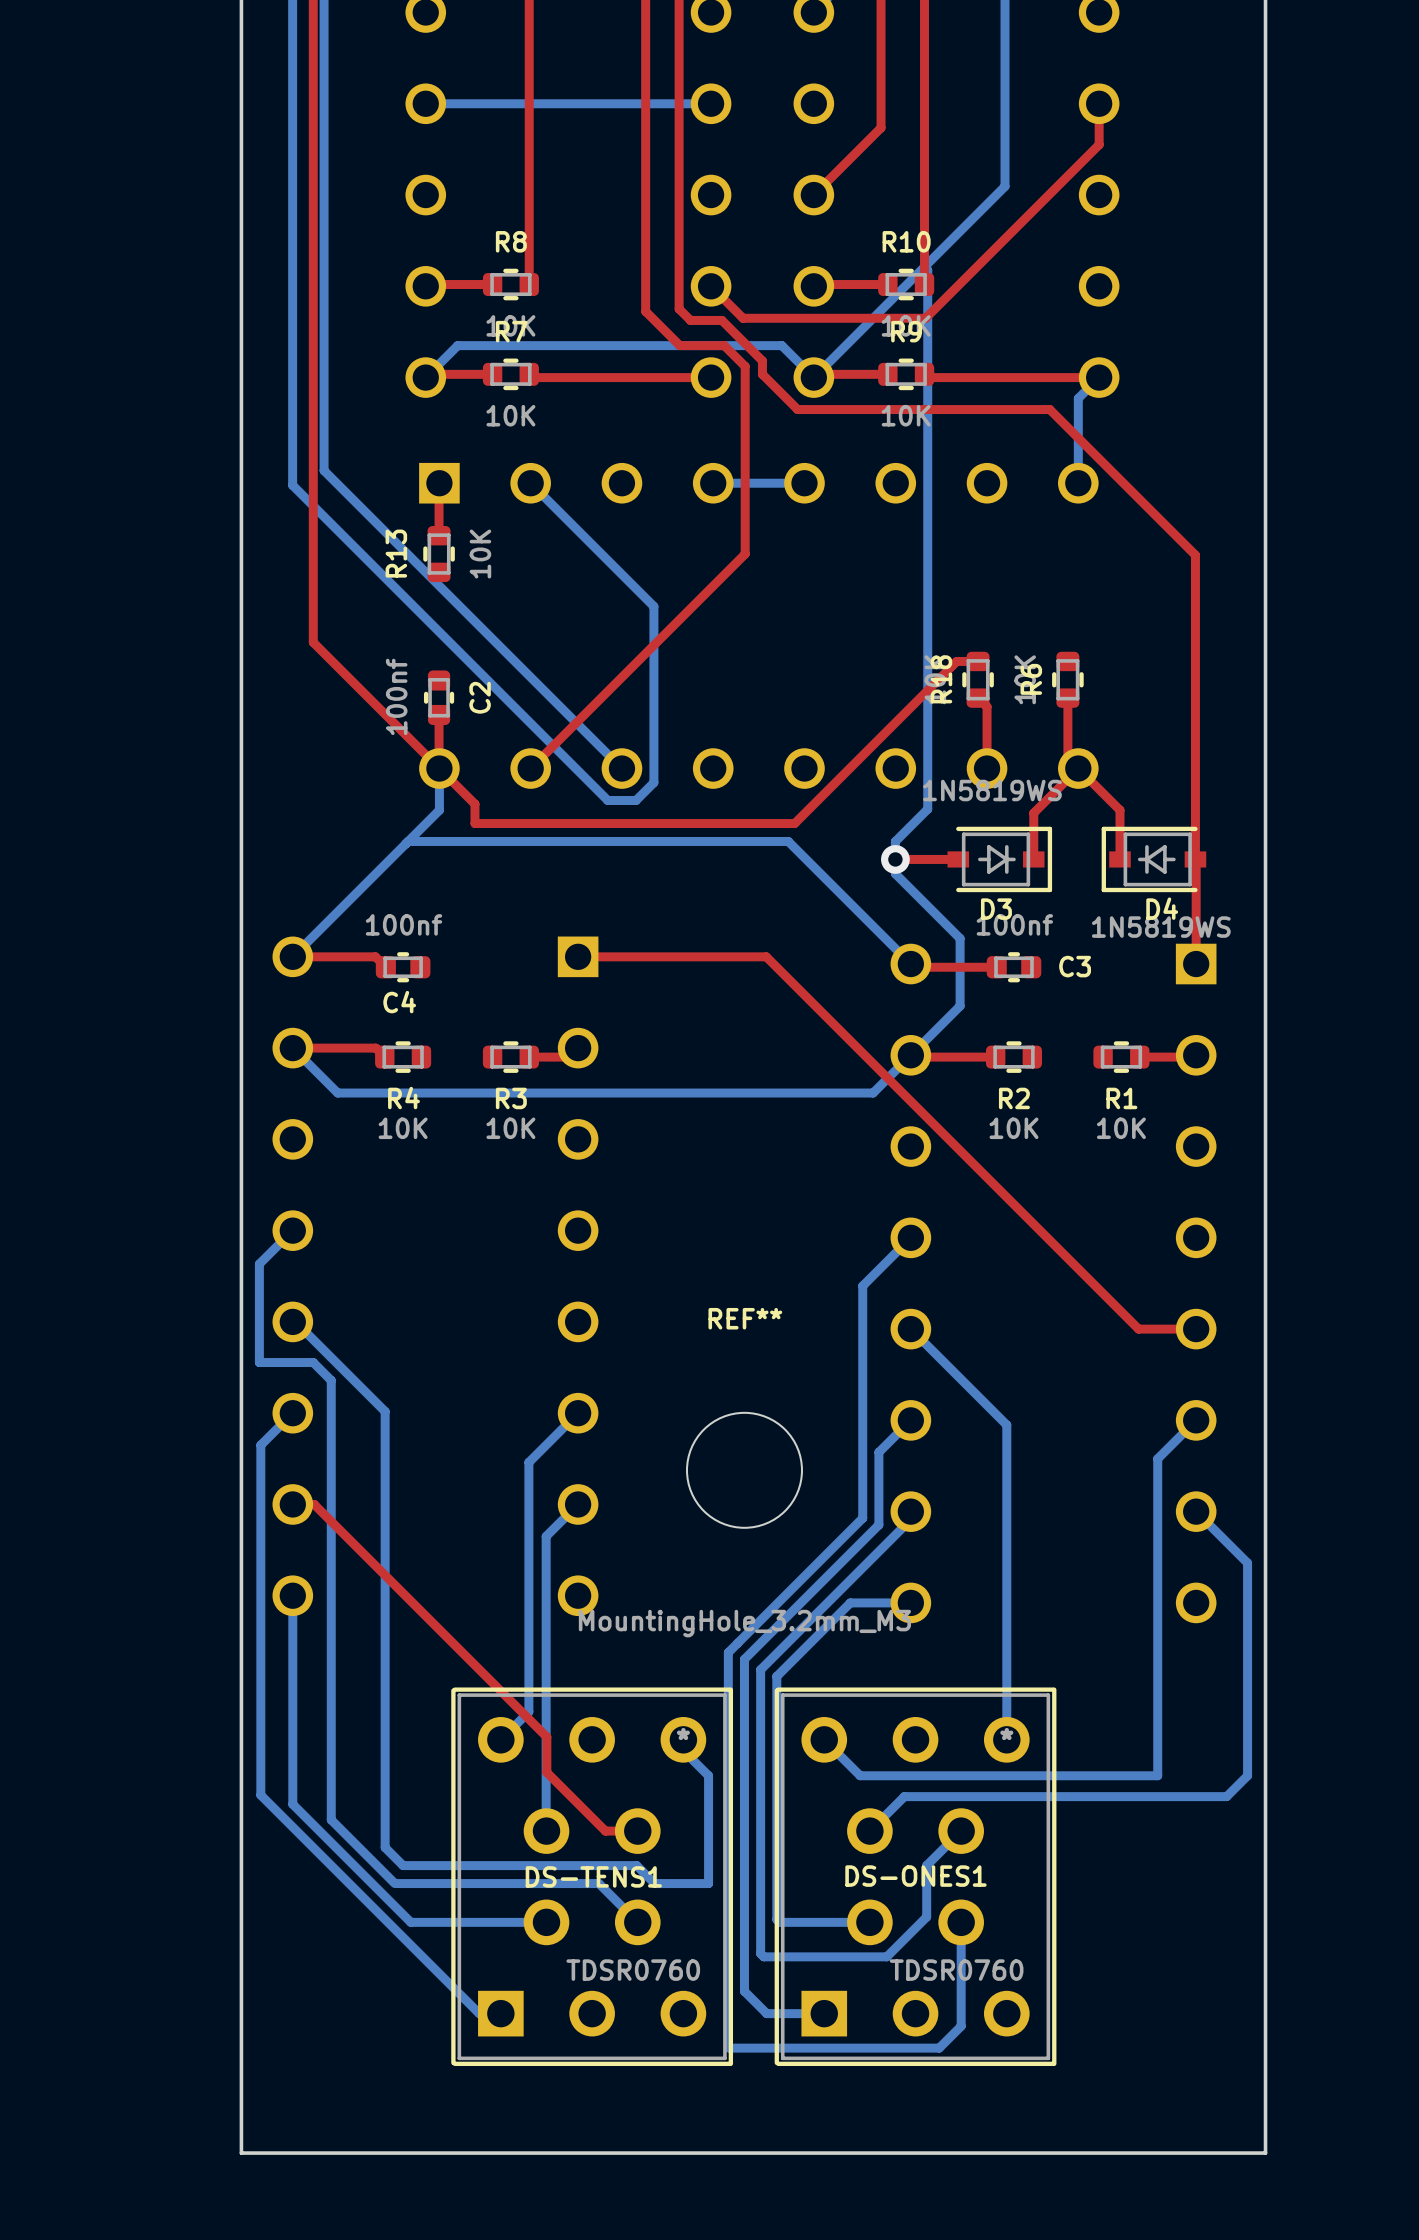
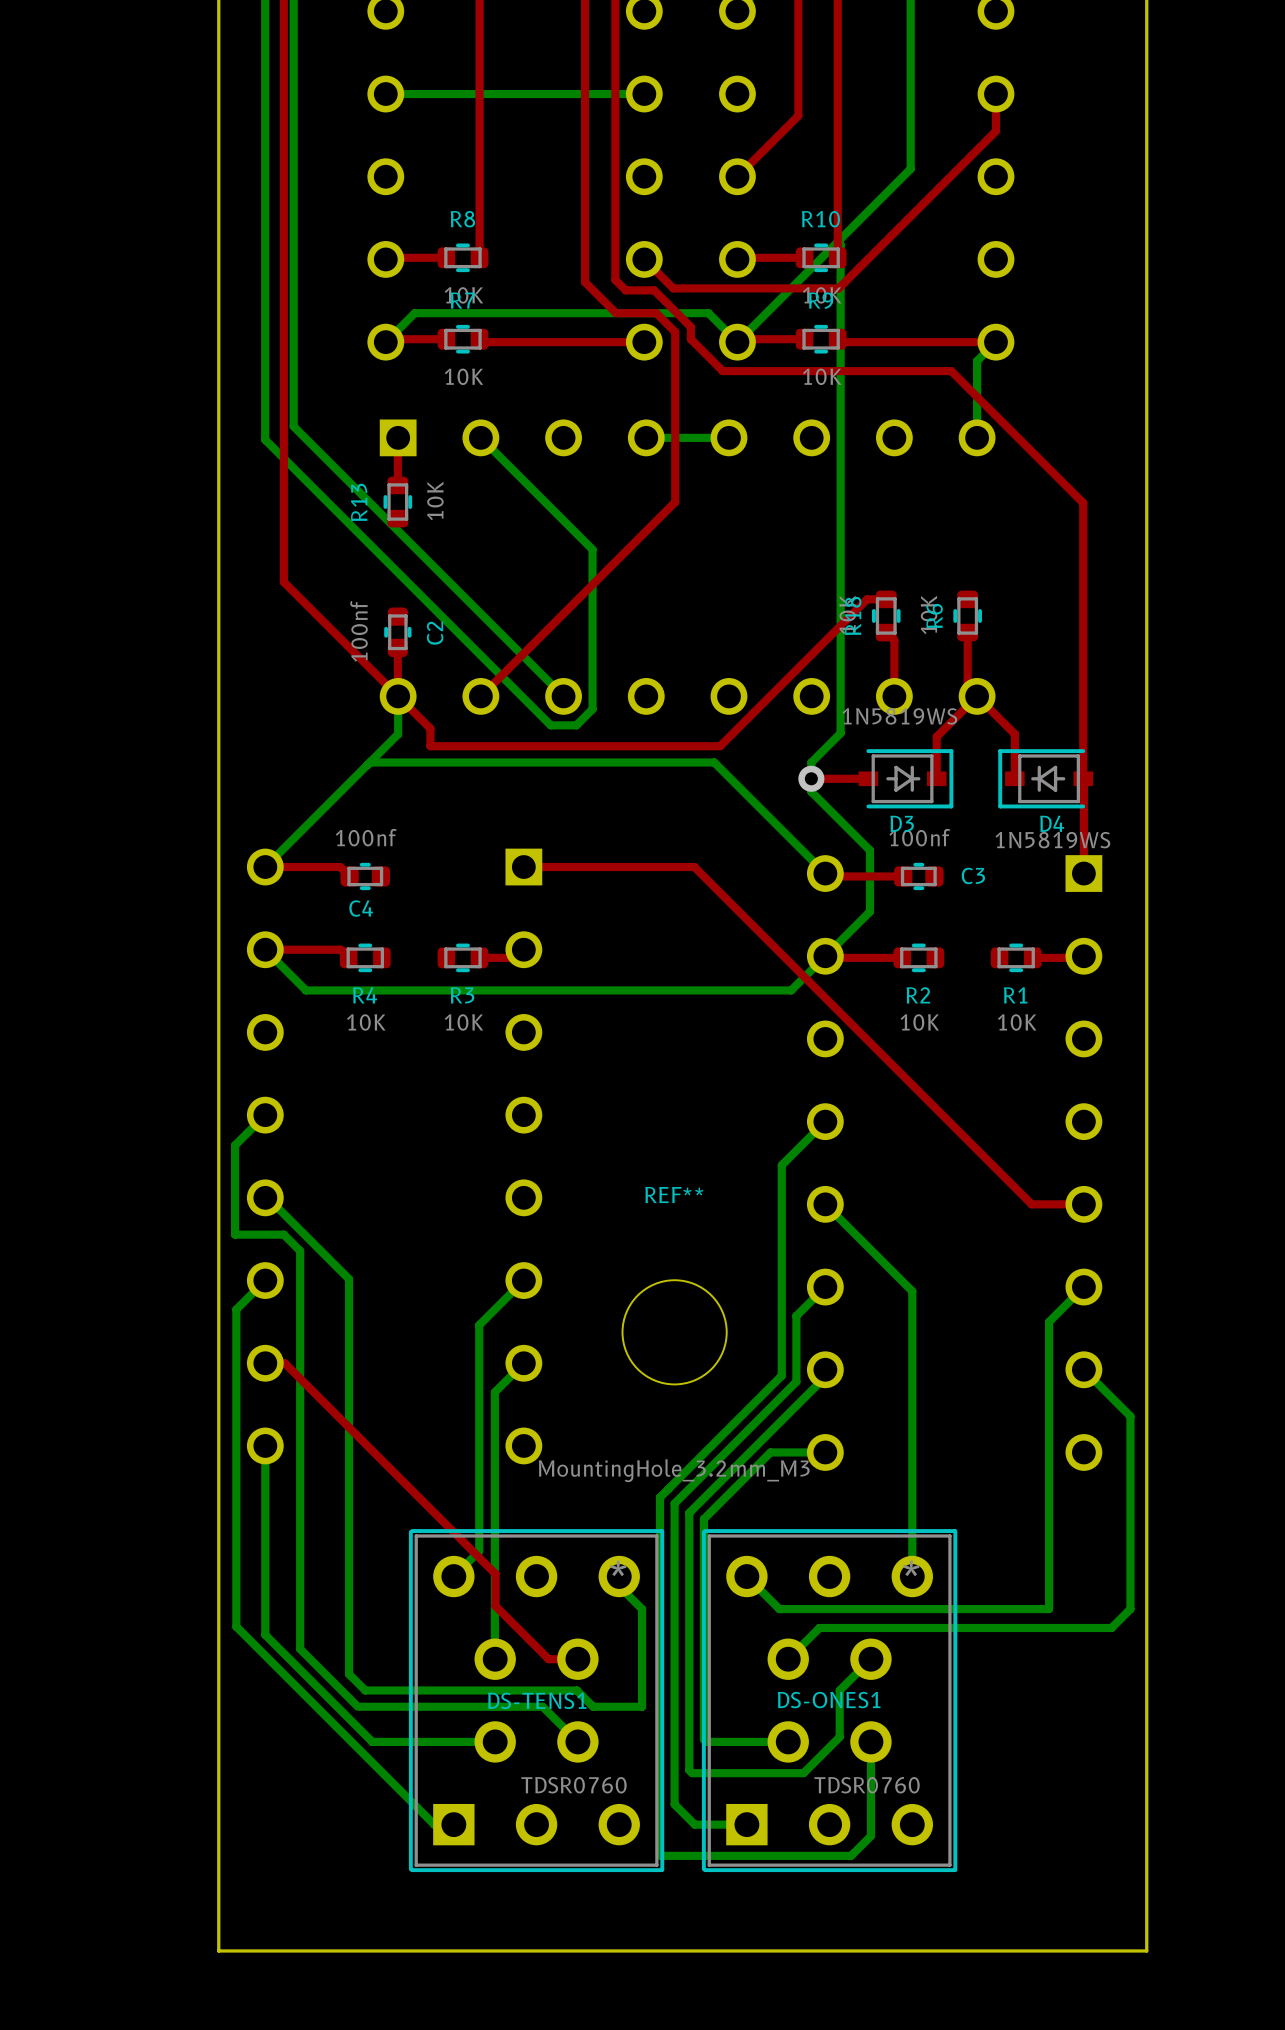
DS-TENS1 footprint: [451, 1687, 734, 2066] -> [408, 1529, 665, 1873]
DS-ONES1 footprint: [774, 1687, 1057, 2066] -> [701, 1529, 958, 1873]

